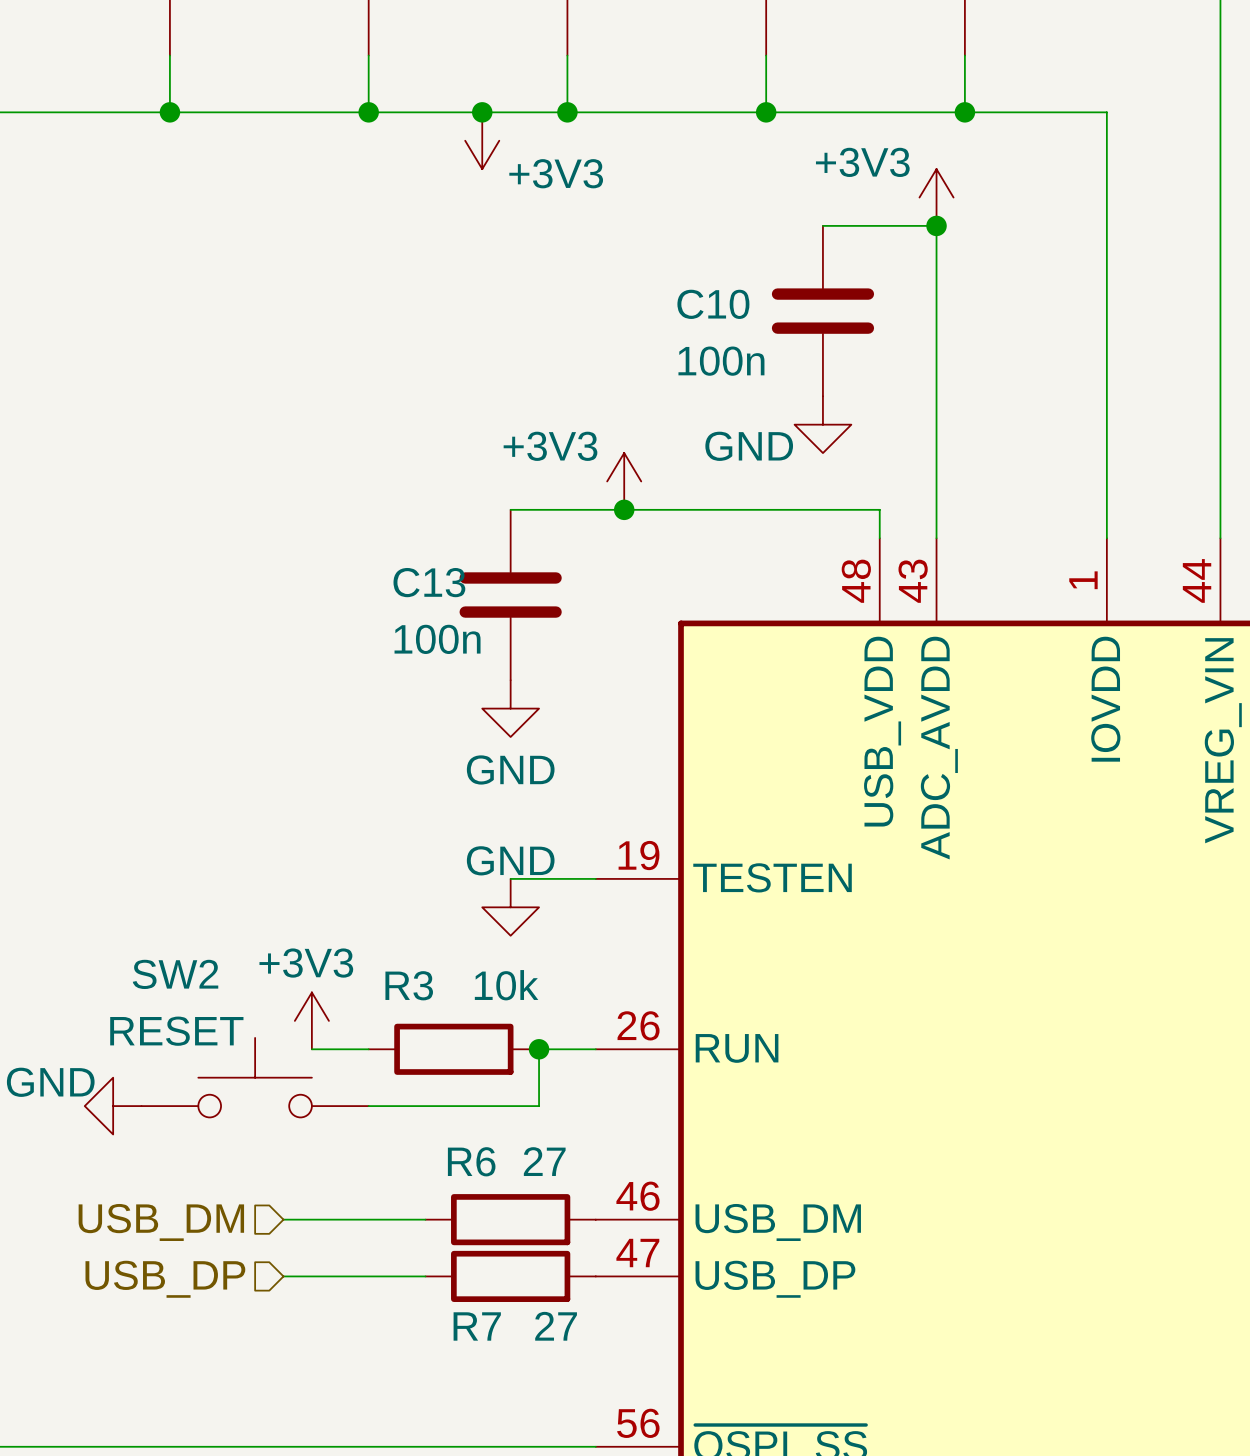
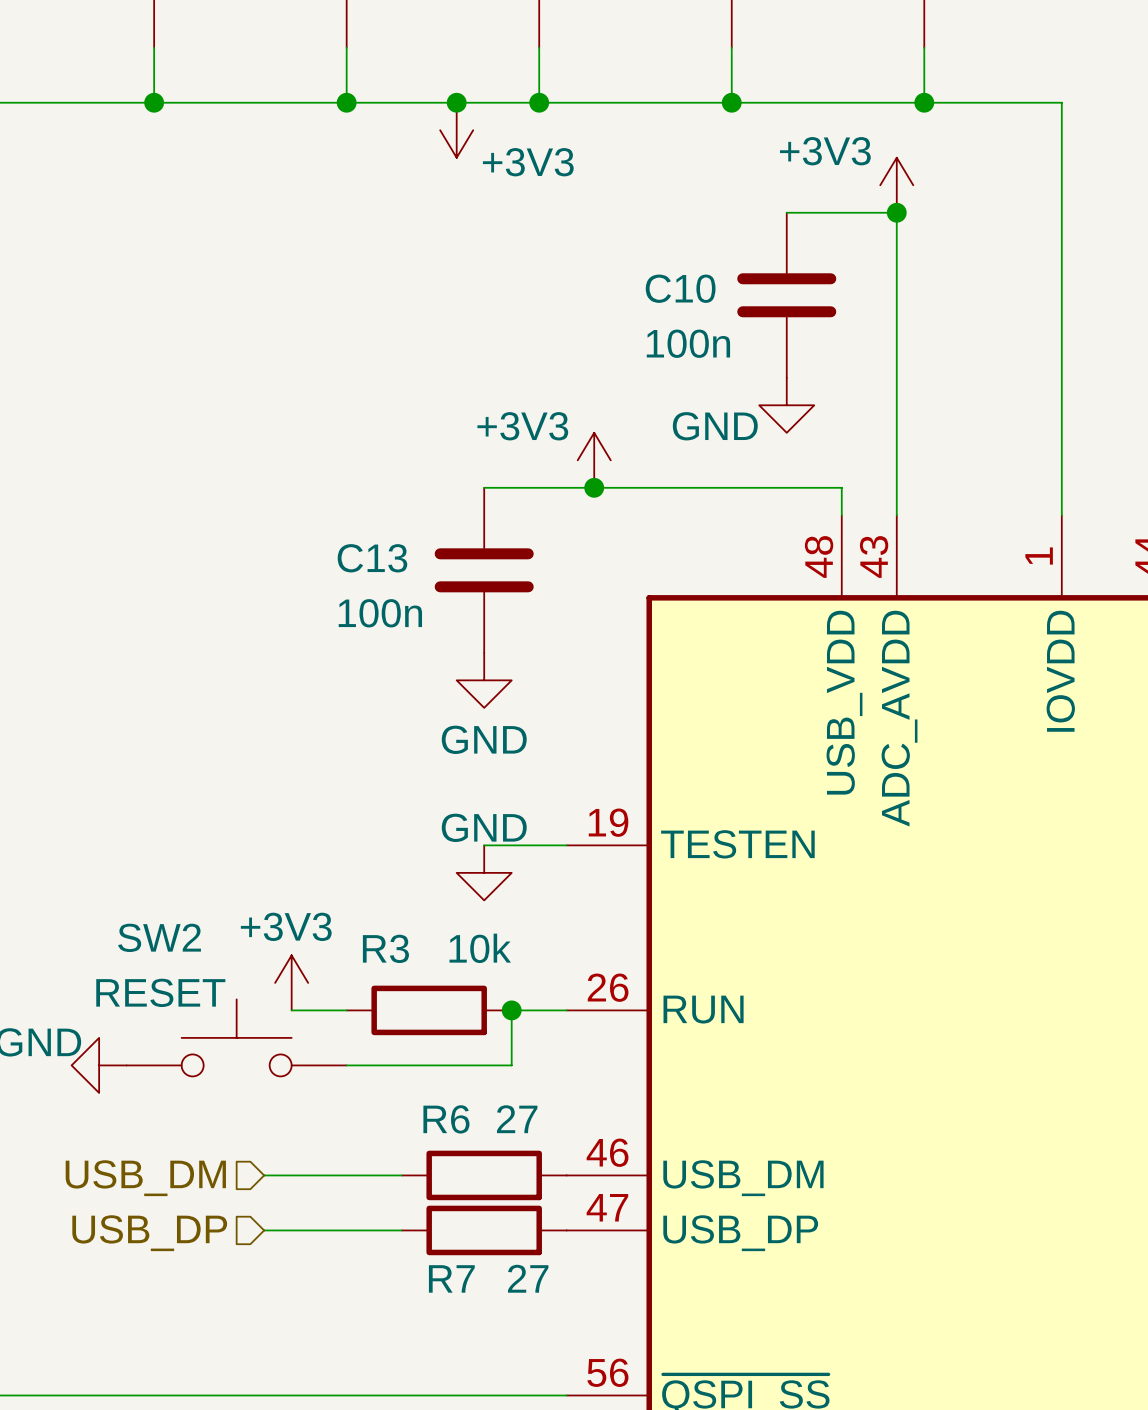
C13 name position: C13 (429, 582) -> C13 (372, 558)
C13 value position: 100n (437, 639) -> 100n (380, 613)

